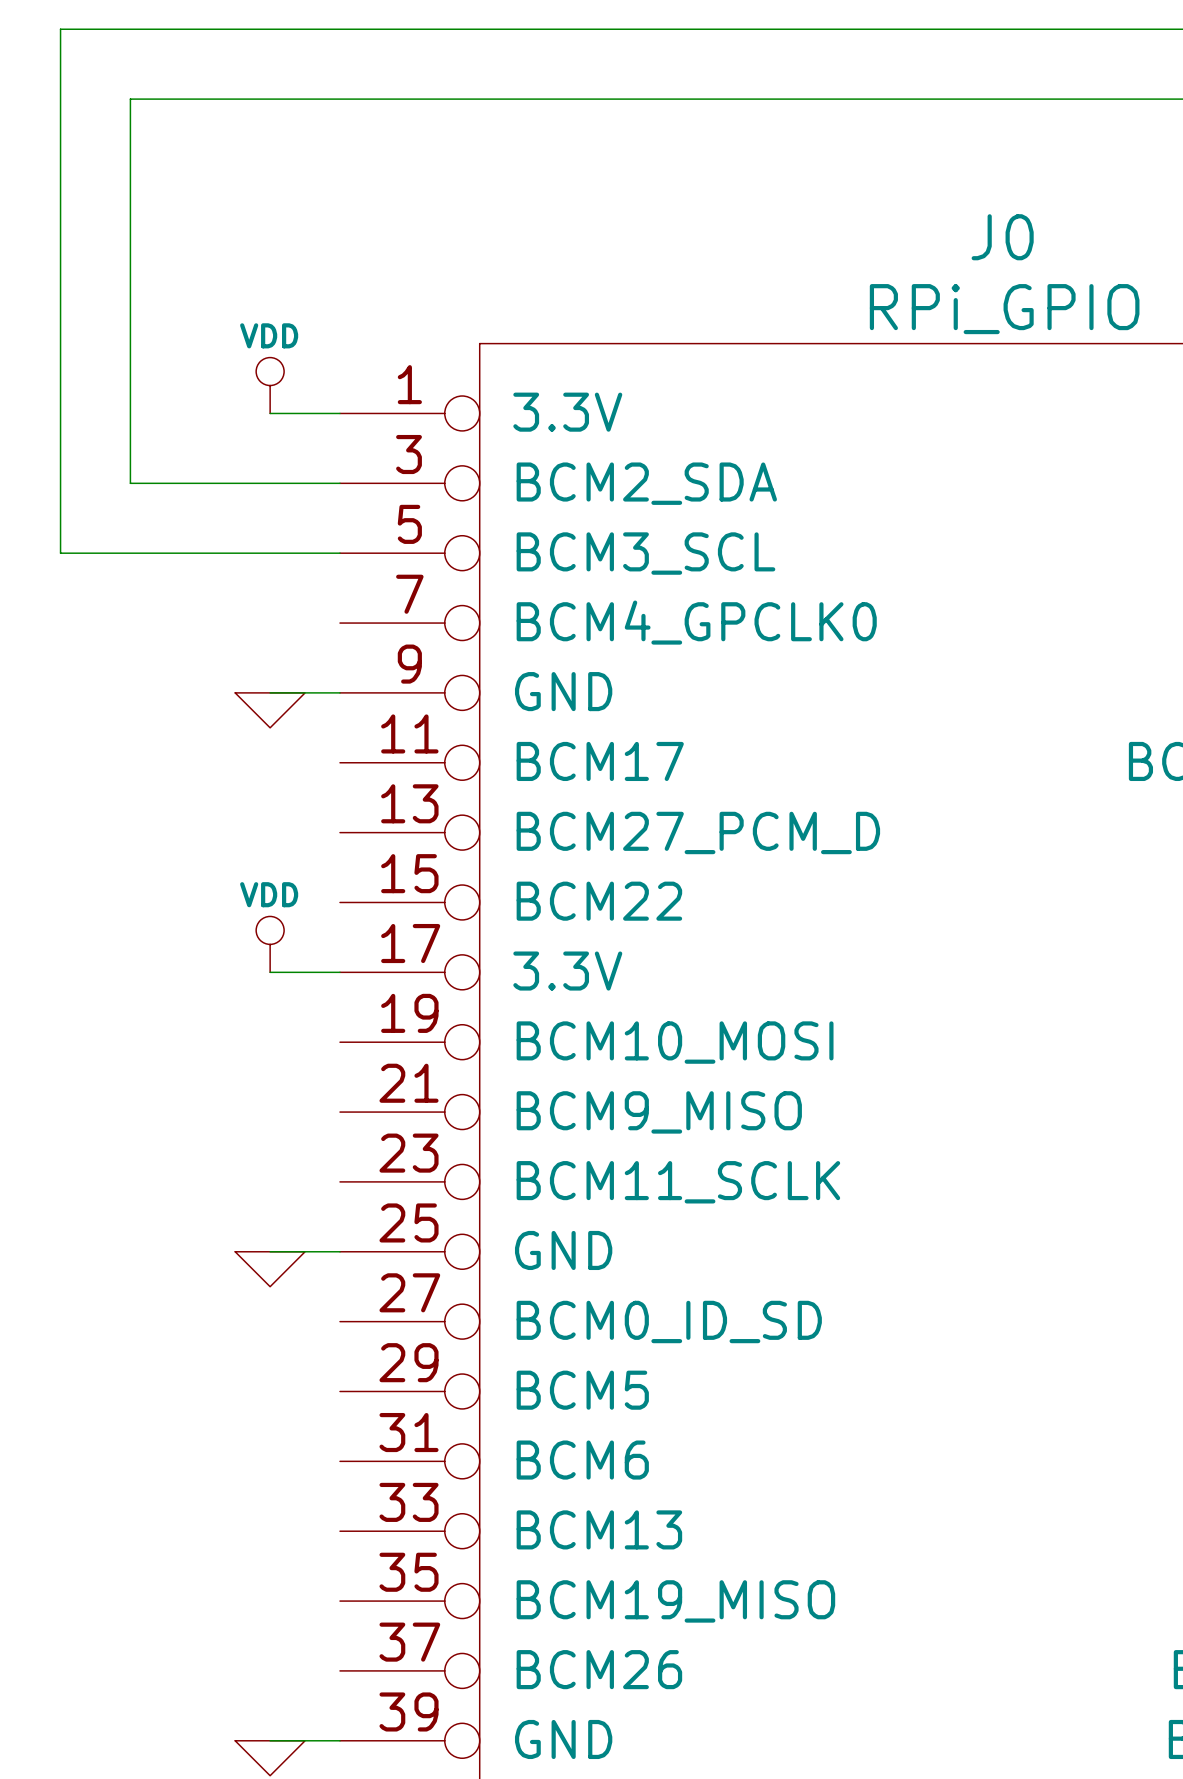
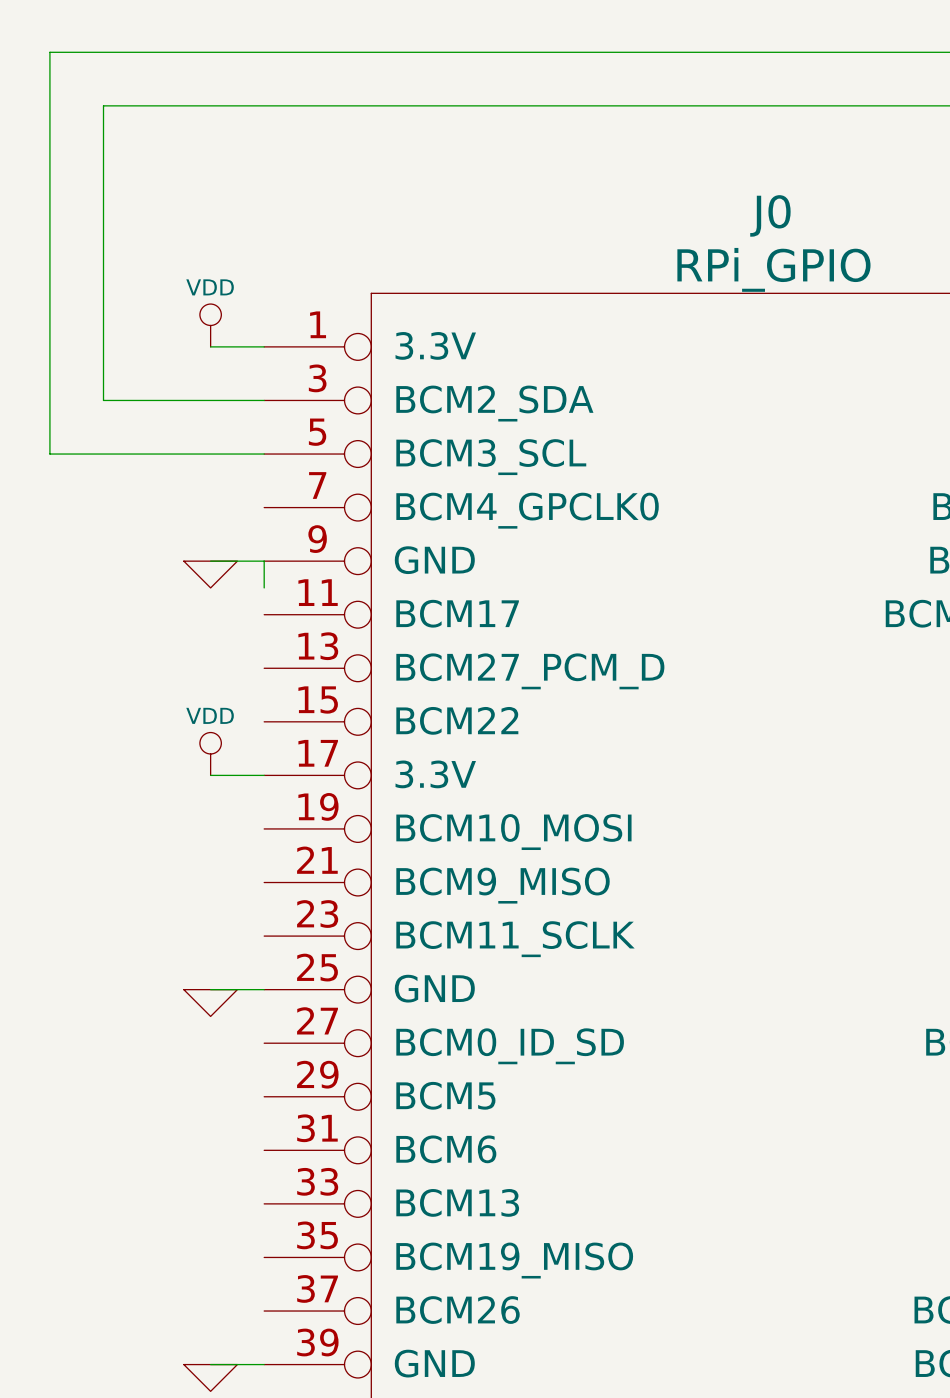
wire: none -> (264, 561) (264, 587)

